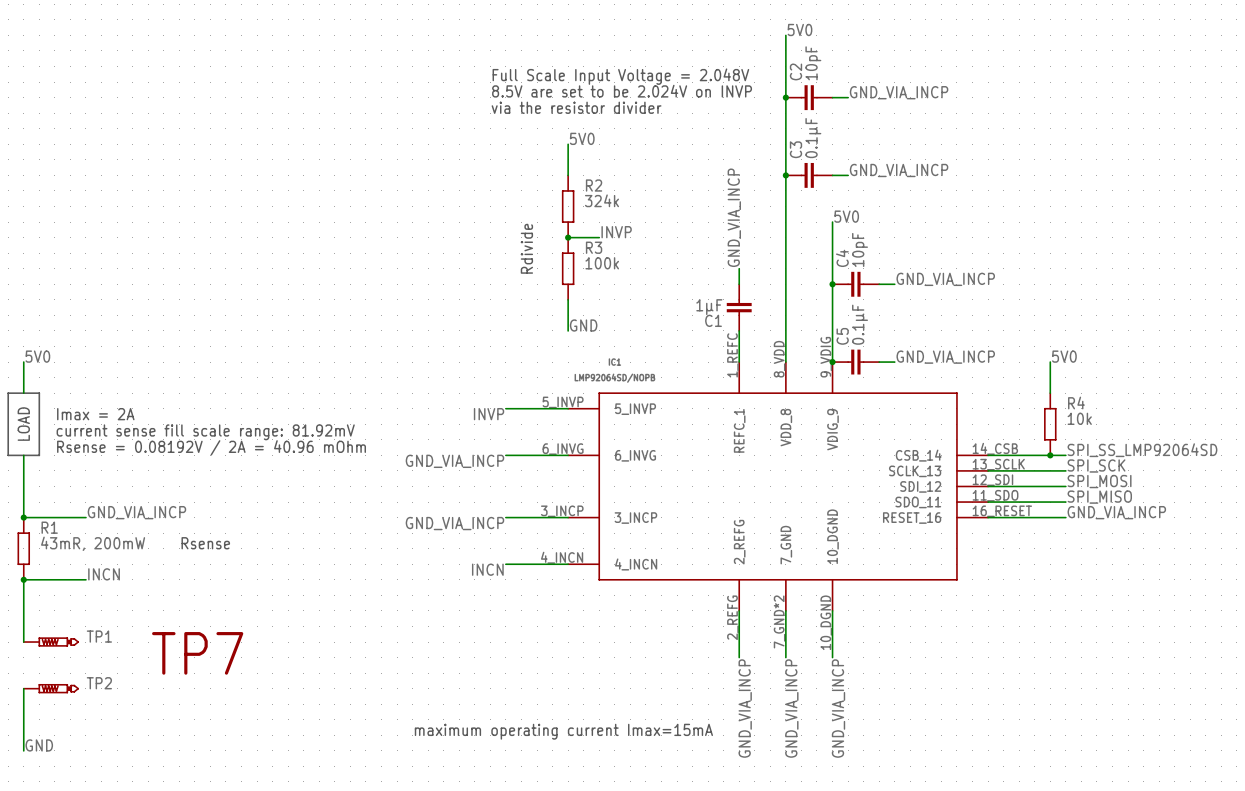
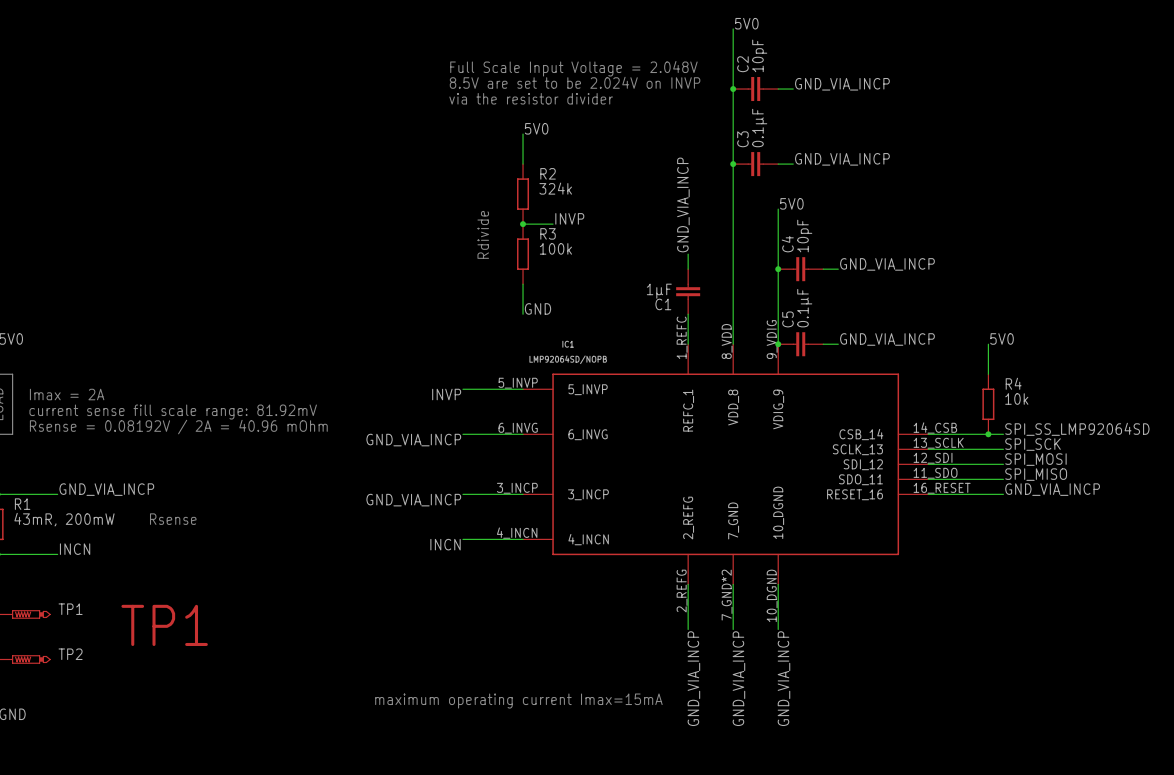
text: TP7 (197, 653) -> TP1 (164, 625)

